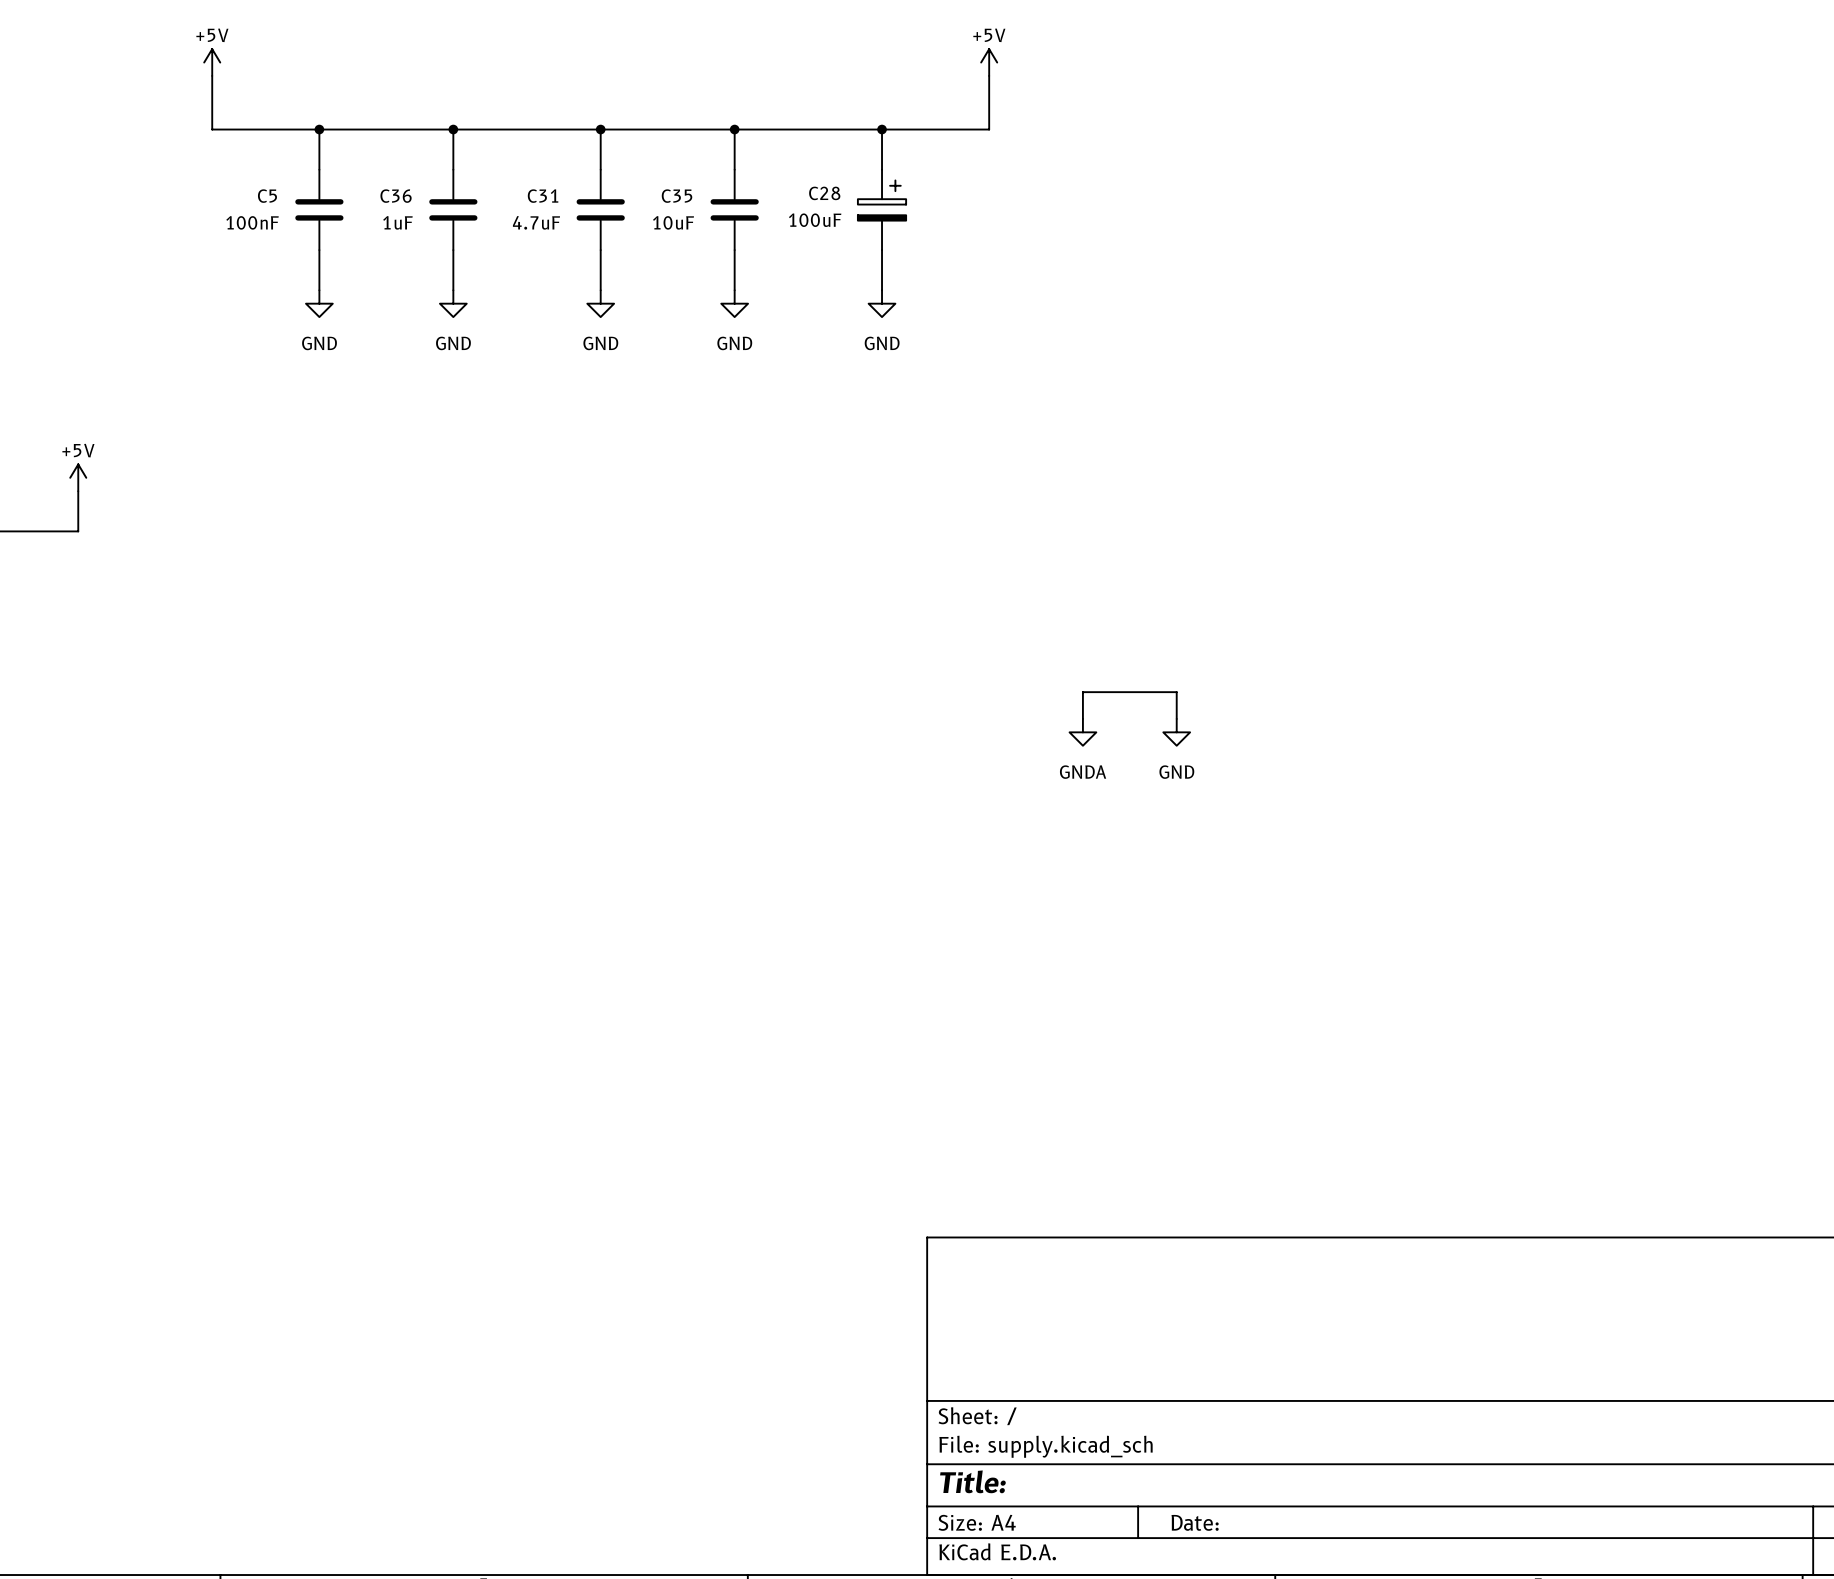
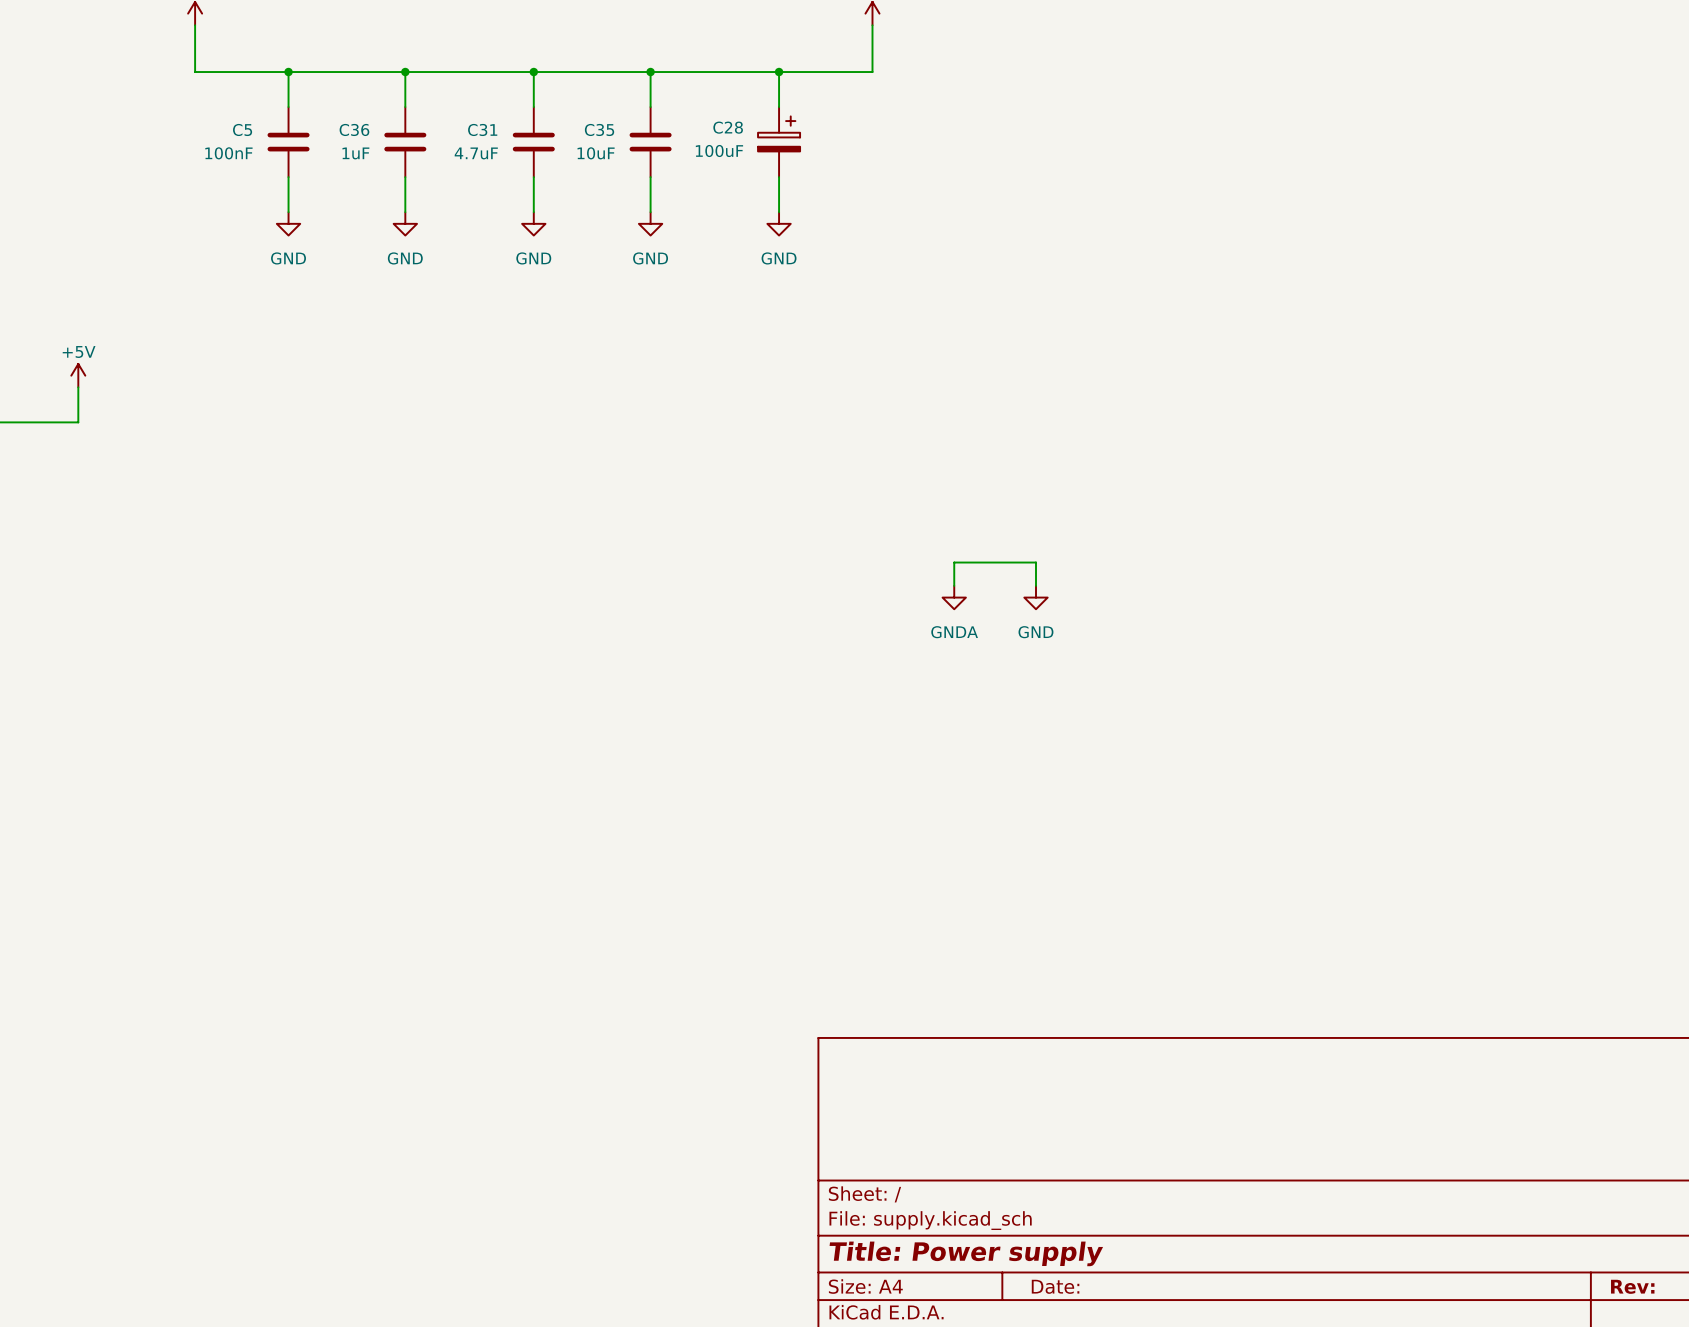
title block: Title: (972, 1481) -> Title: Power supply (966, 1253)

